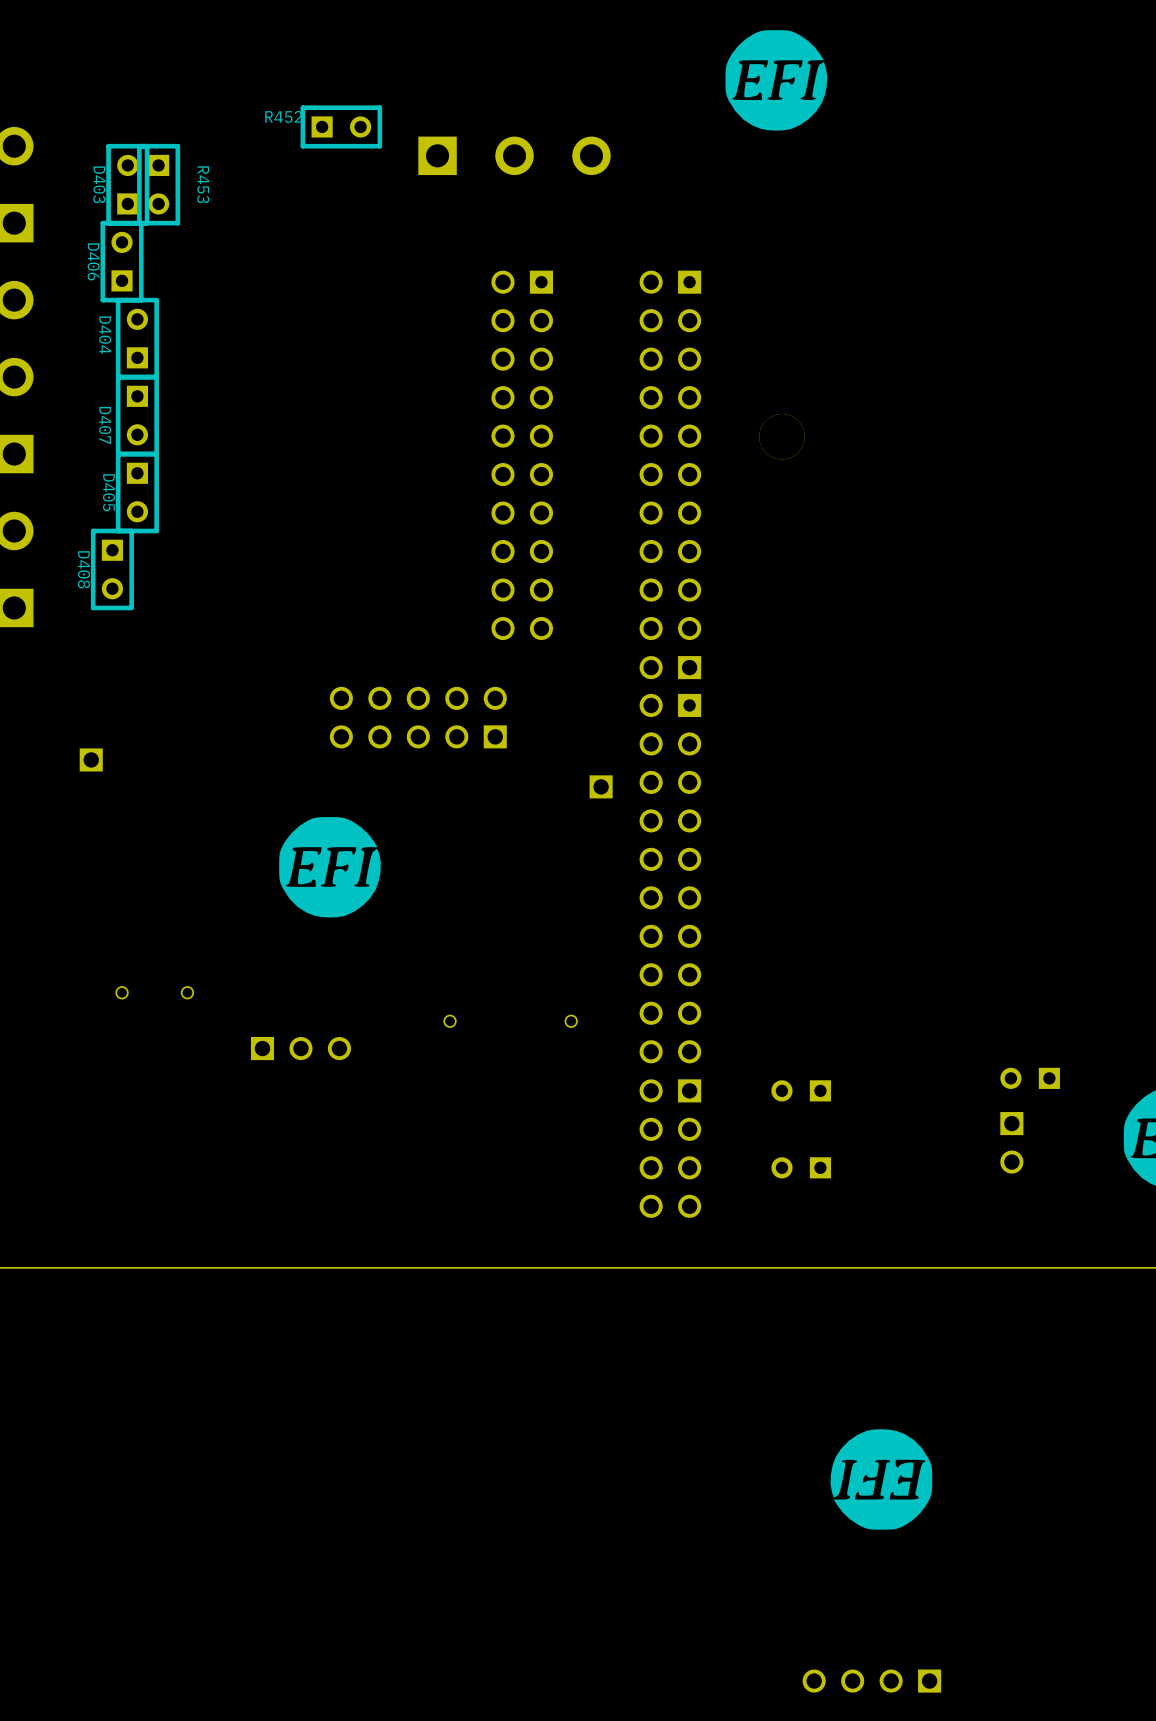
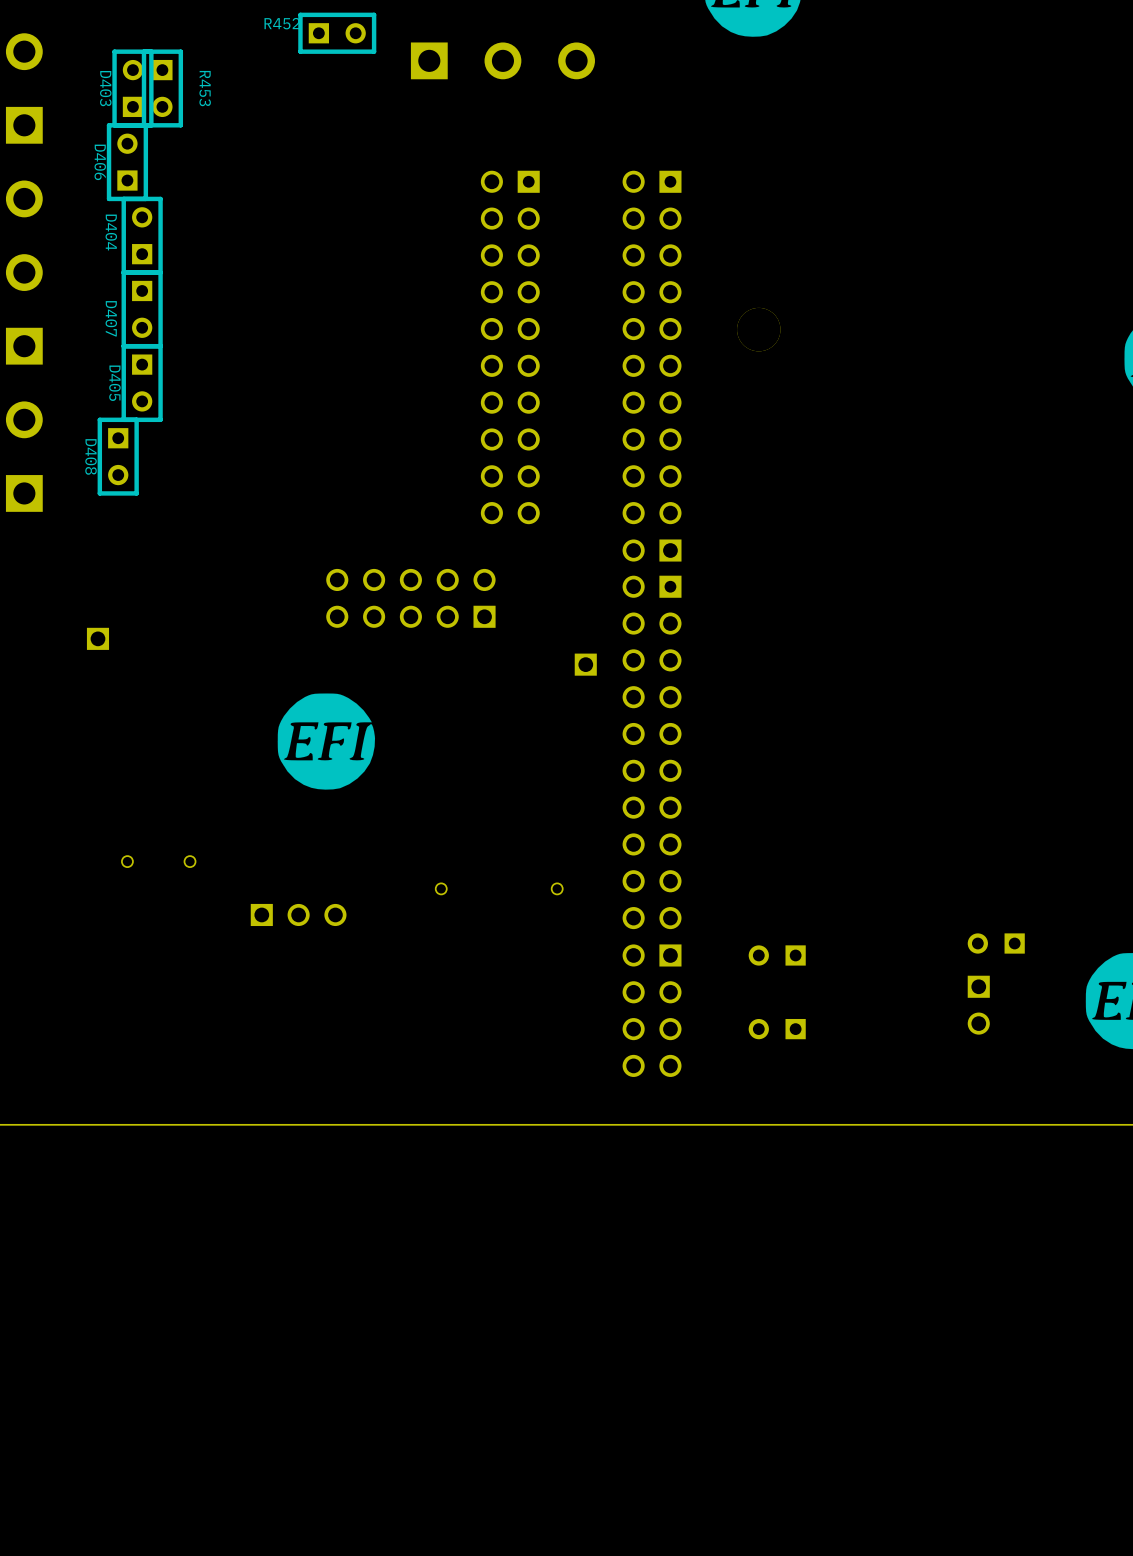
drawing: [830, 1429, 933, 1530] -> none
part: (871, 1681) -> none

